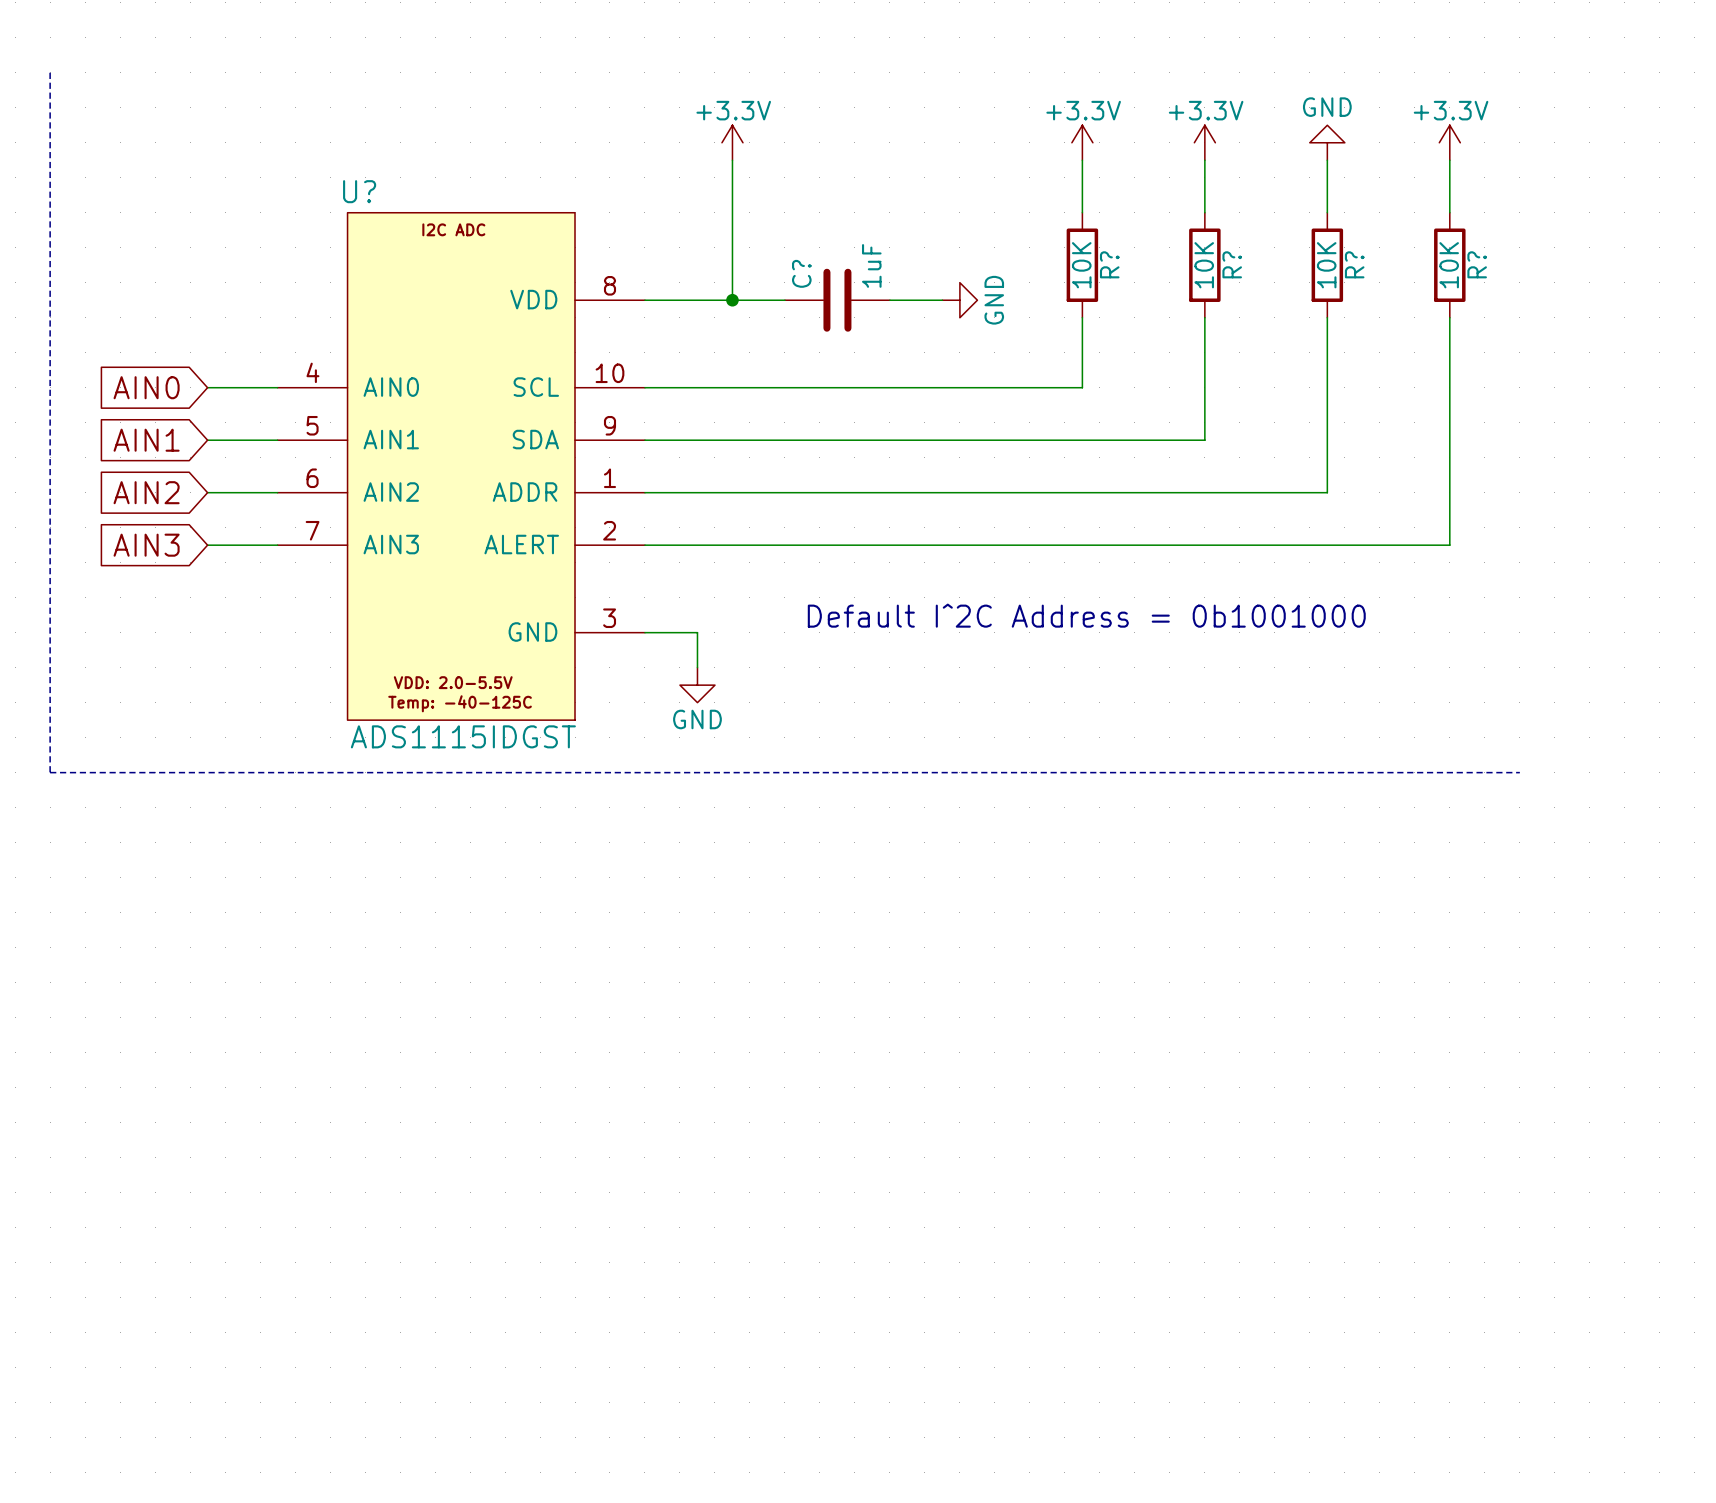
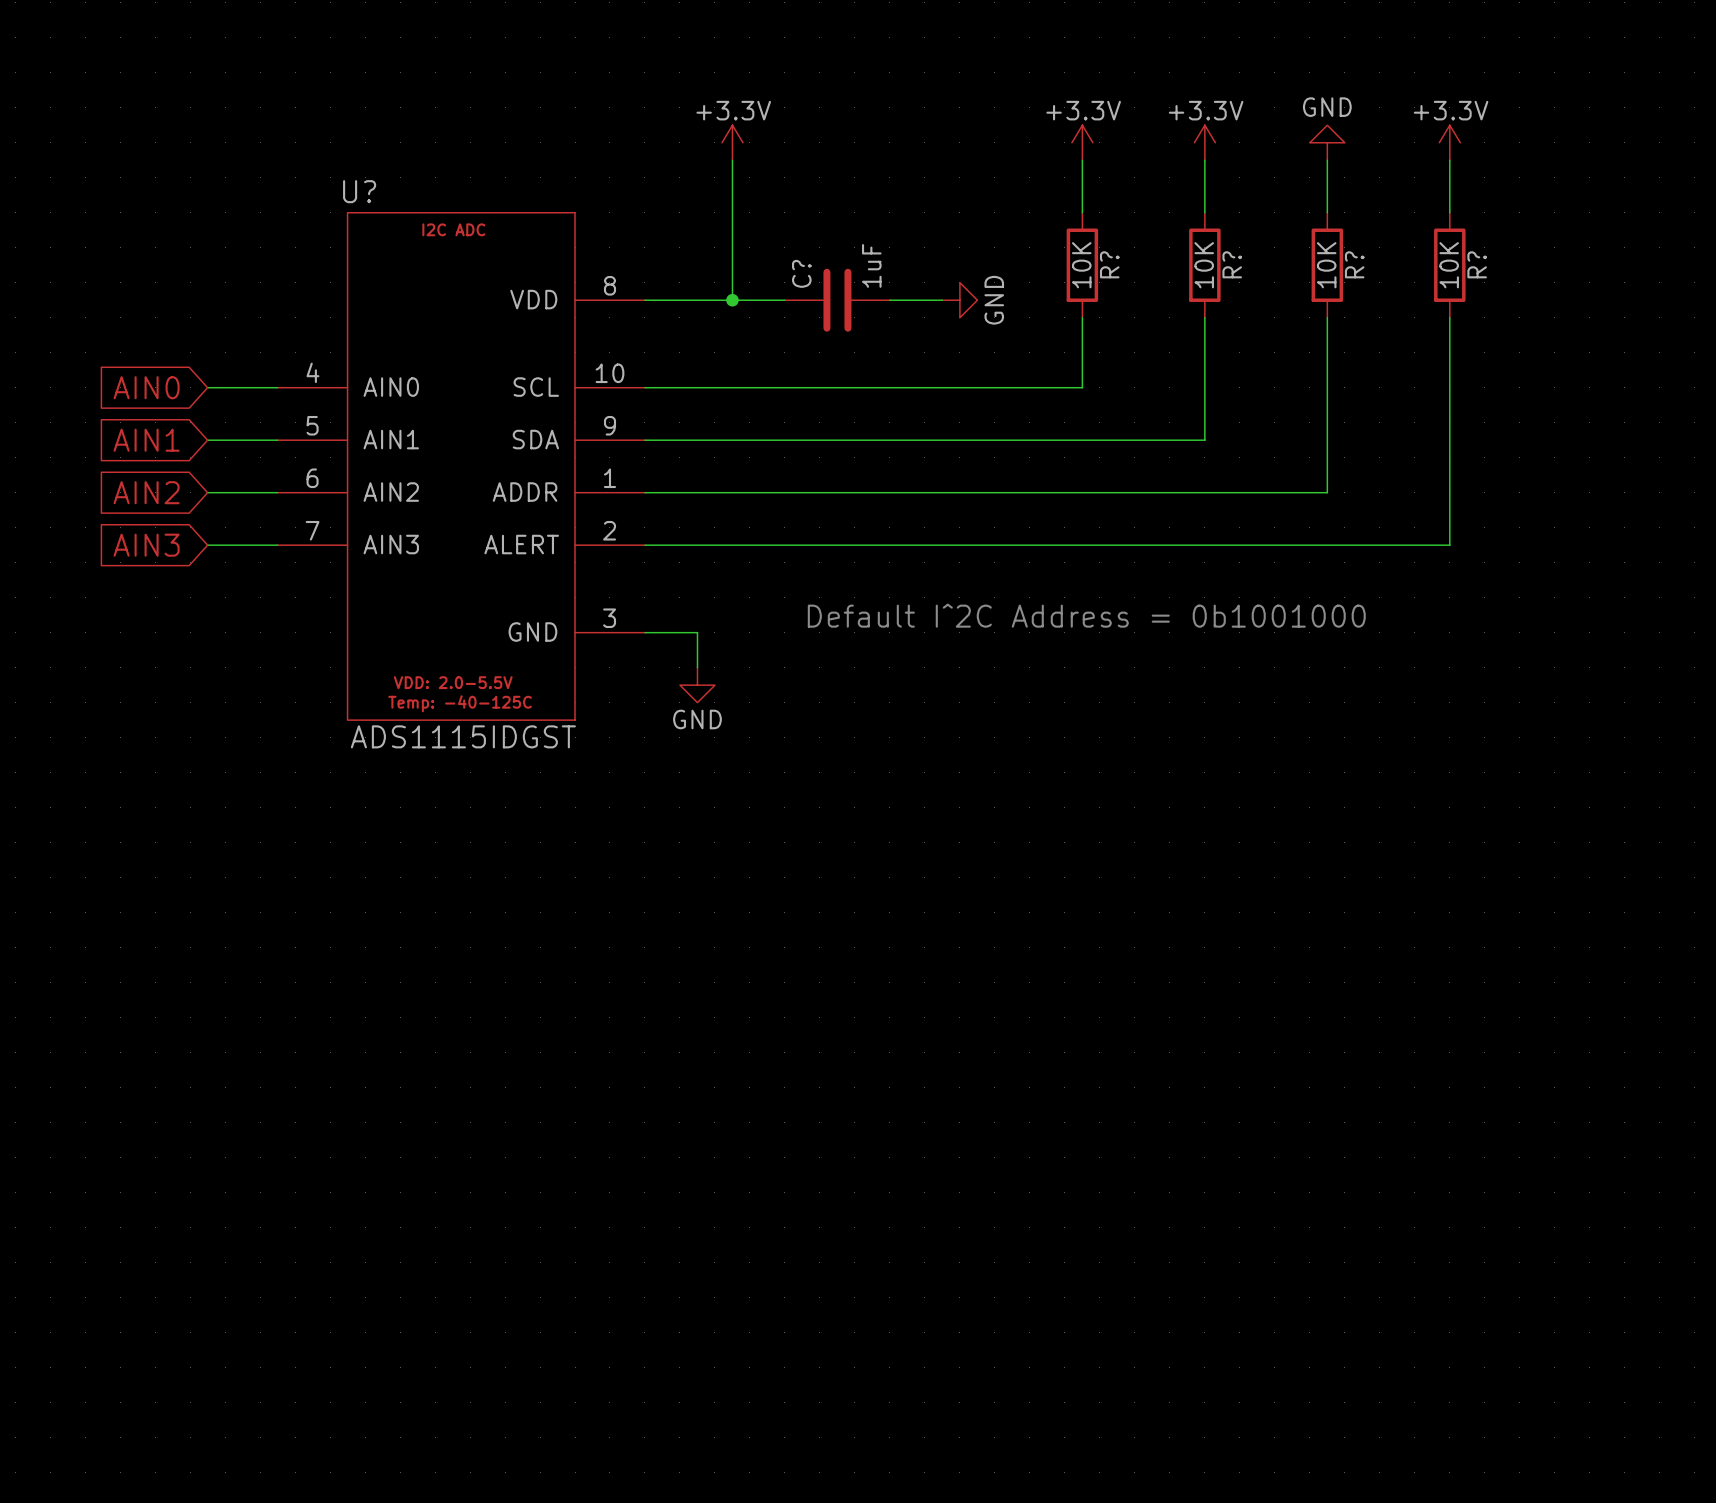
line: (50, 72) (50, 772) (1519, 772) -> none

